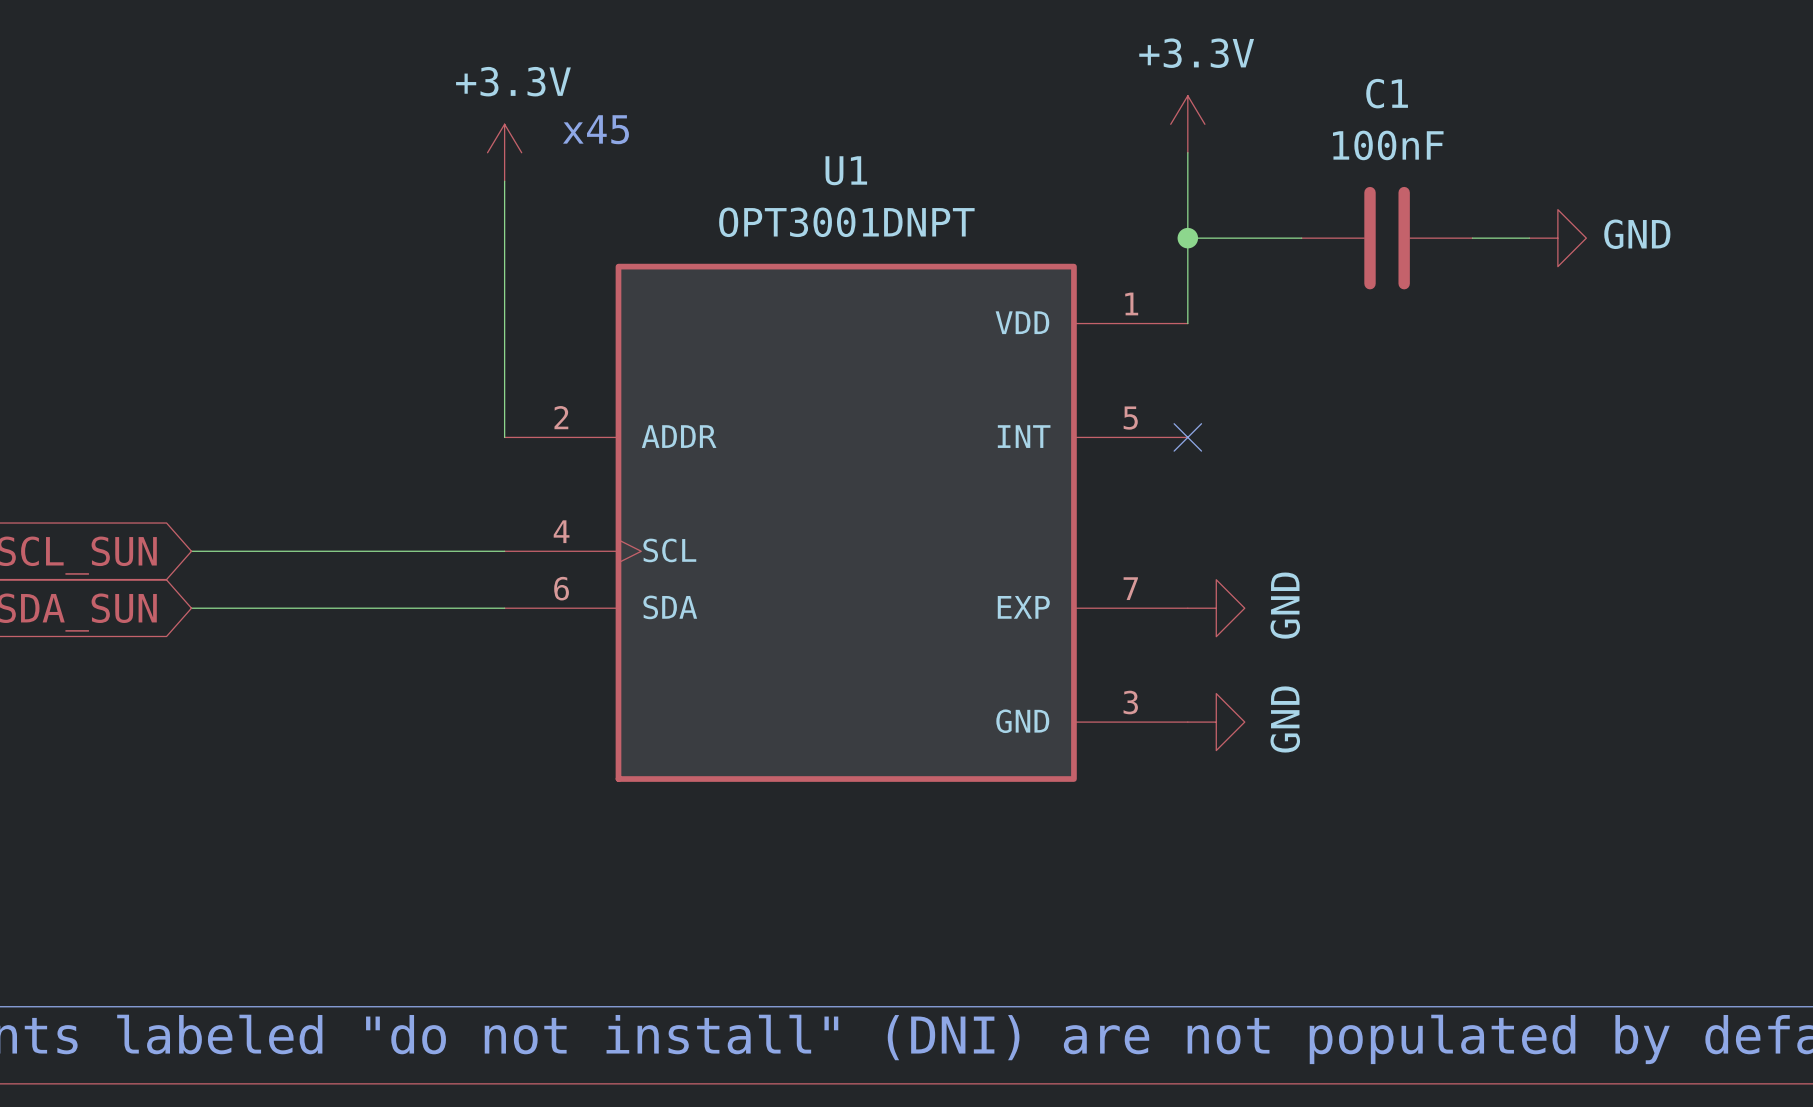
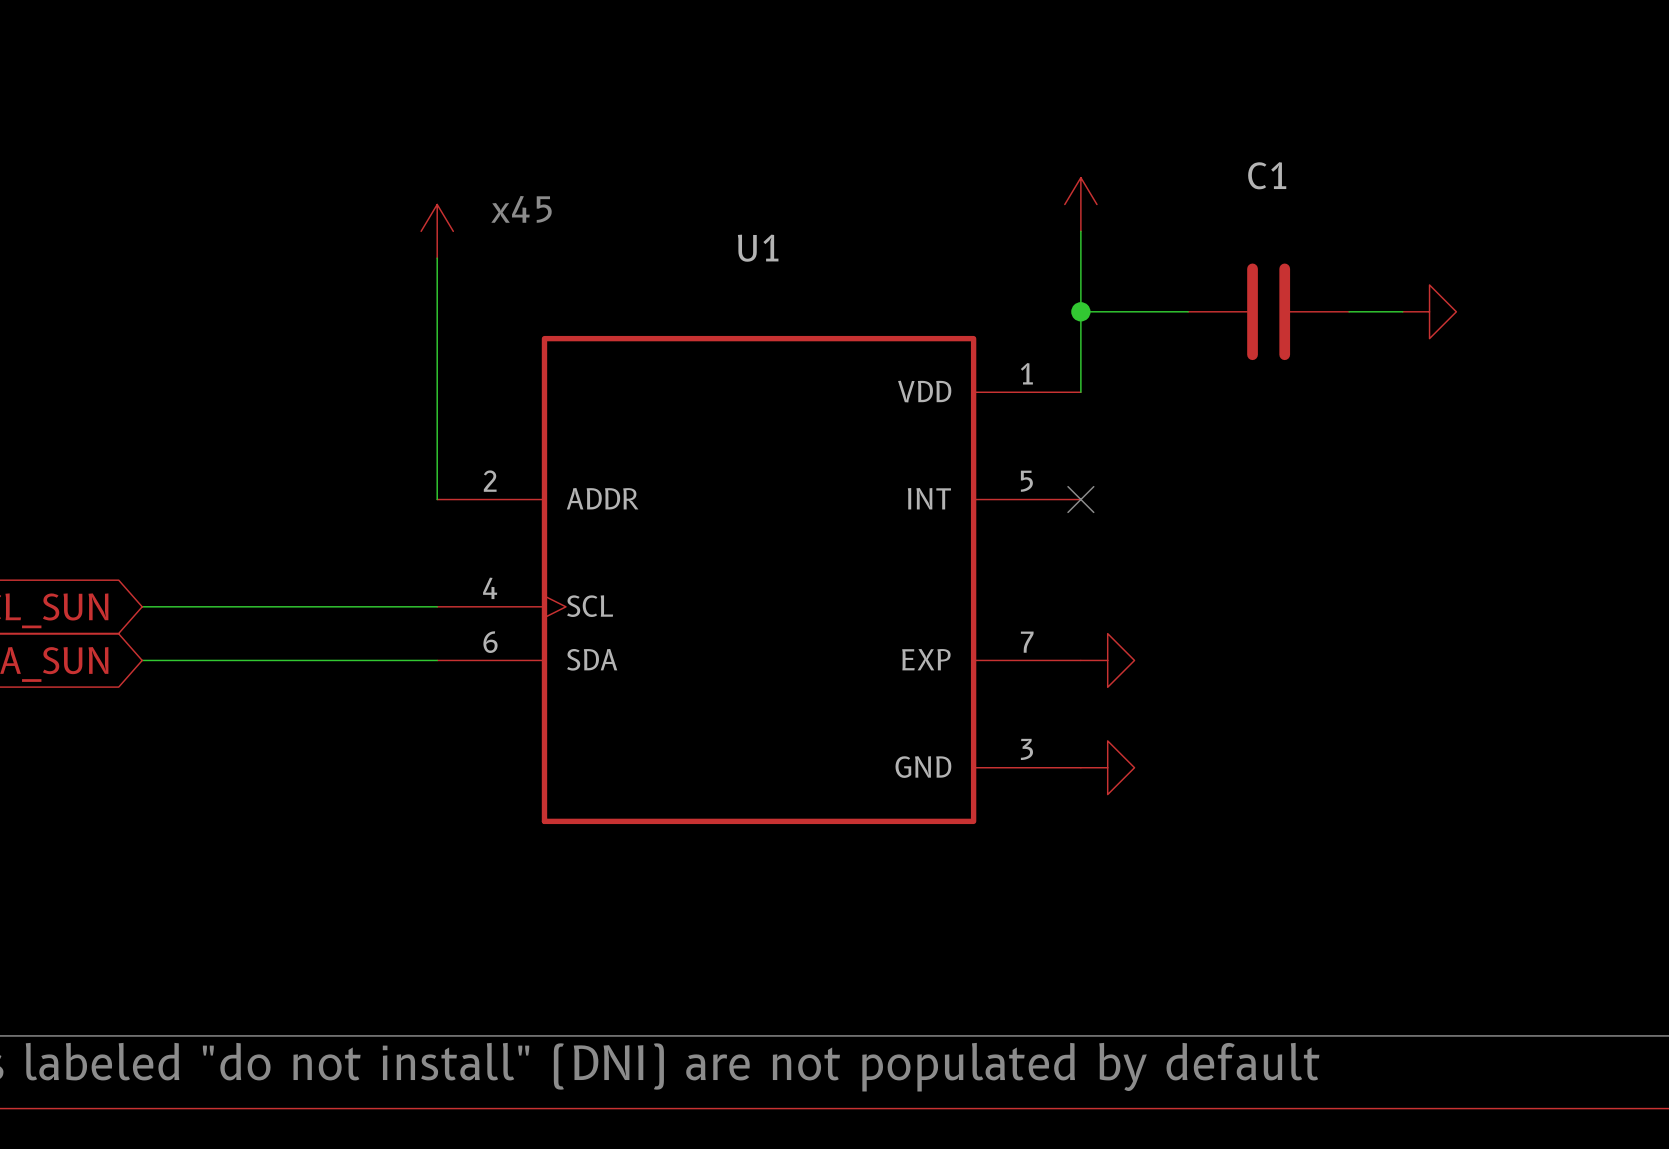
power symbol text: +3.3V (1196, 53) -> none
power symbol text: +3.3V (513, 81) -> none
C1 value: 100nF (1388, 145) -> none
U1 value: OPT3001DNPT (846, 222) -> none
power symbol text: GND (1637, 234) -> none
power symbol text: GND (1285, 605) -> none
power symbol text: GND (1285, 719) -> none

